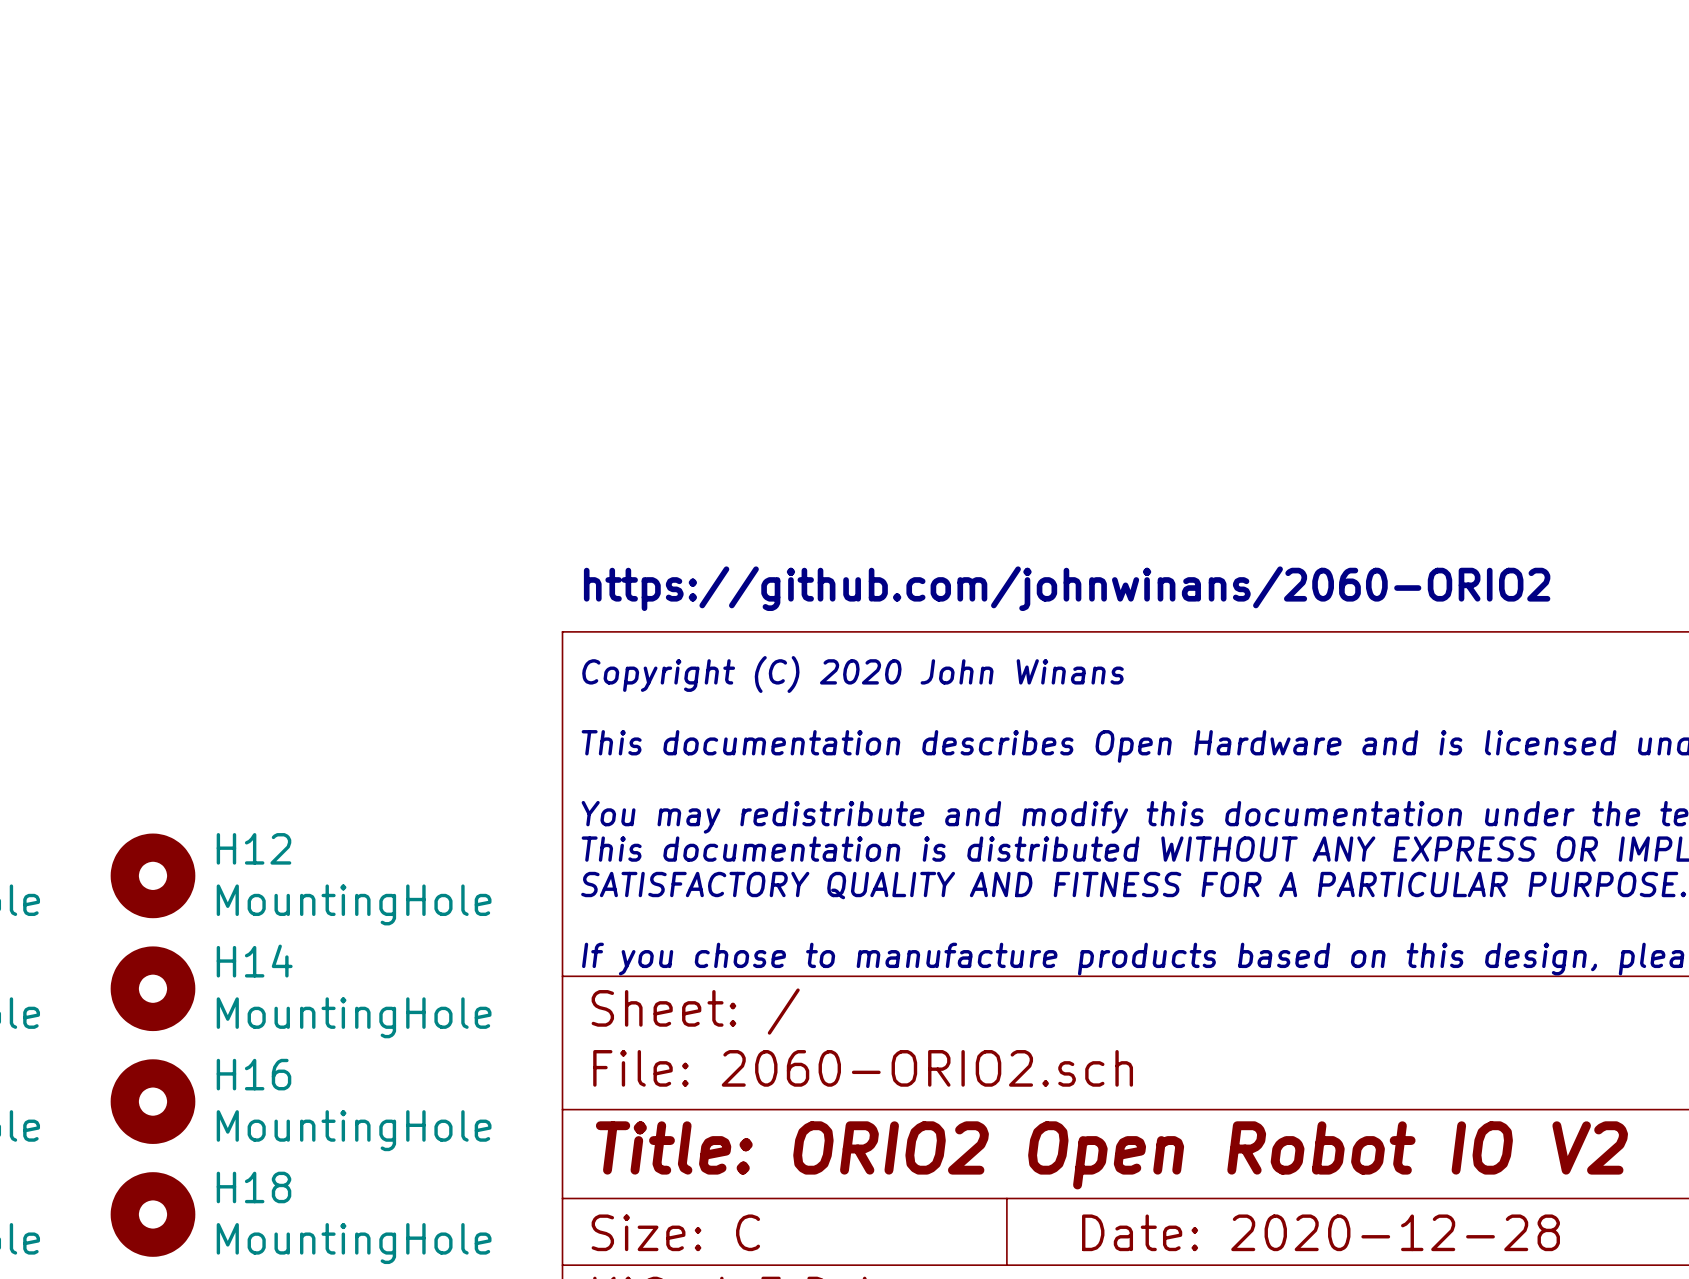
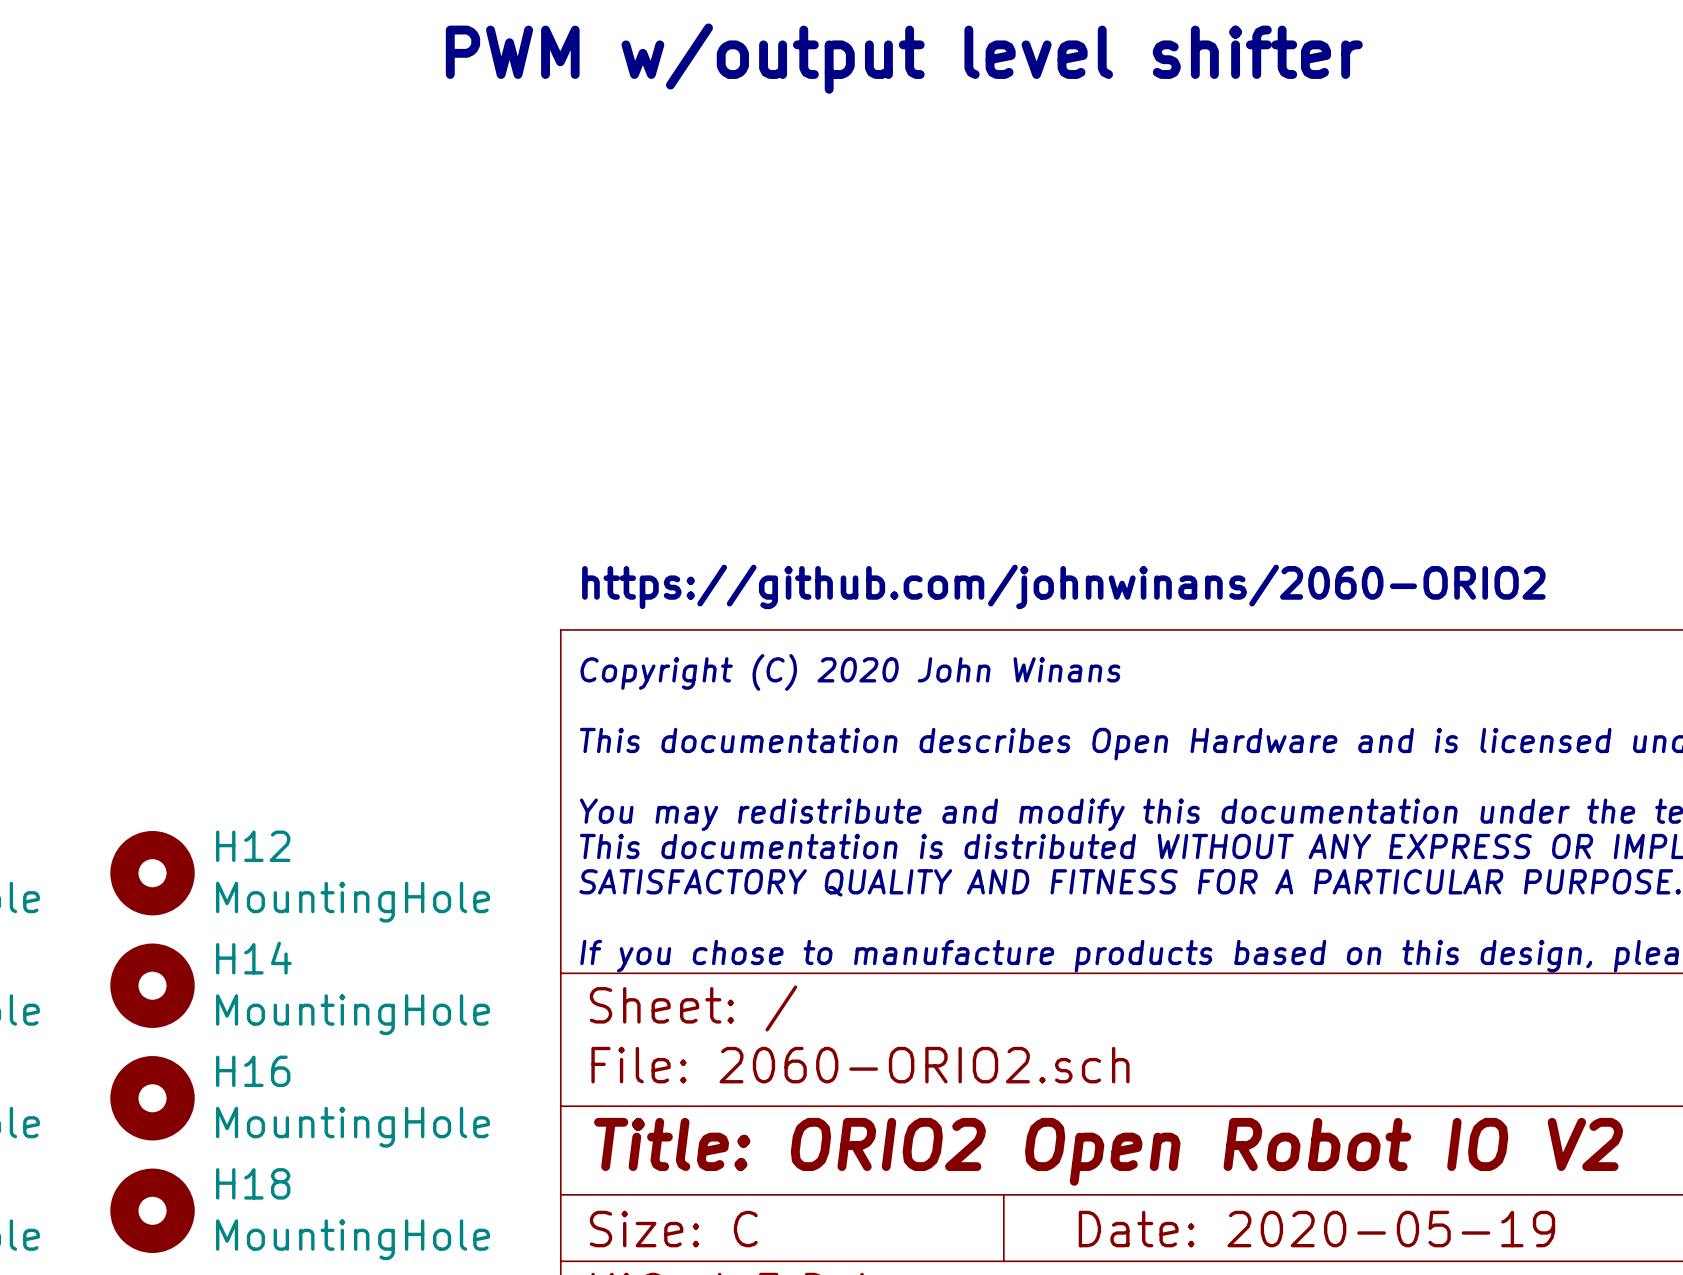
text: none -> PWM w/output level shifter (904, 58)
title block: Date: 2020-12-28 (1321, 1232) -> Date: 2020-05-19 (1316, 1229)

